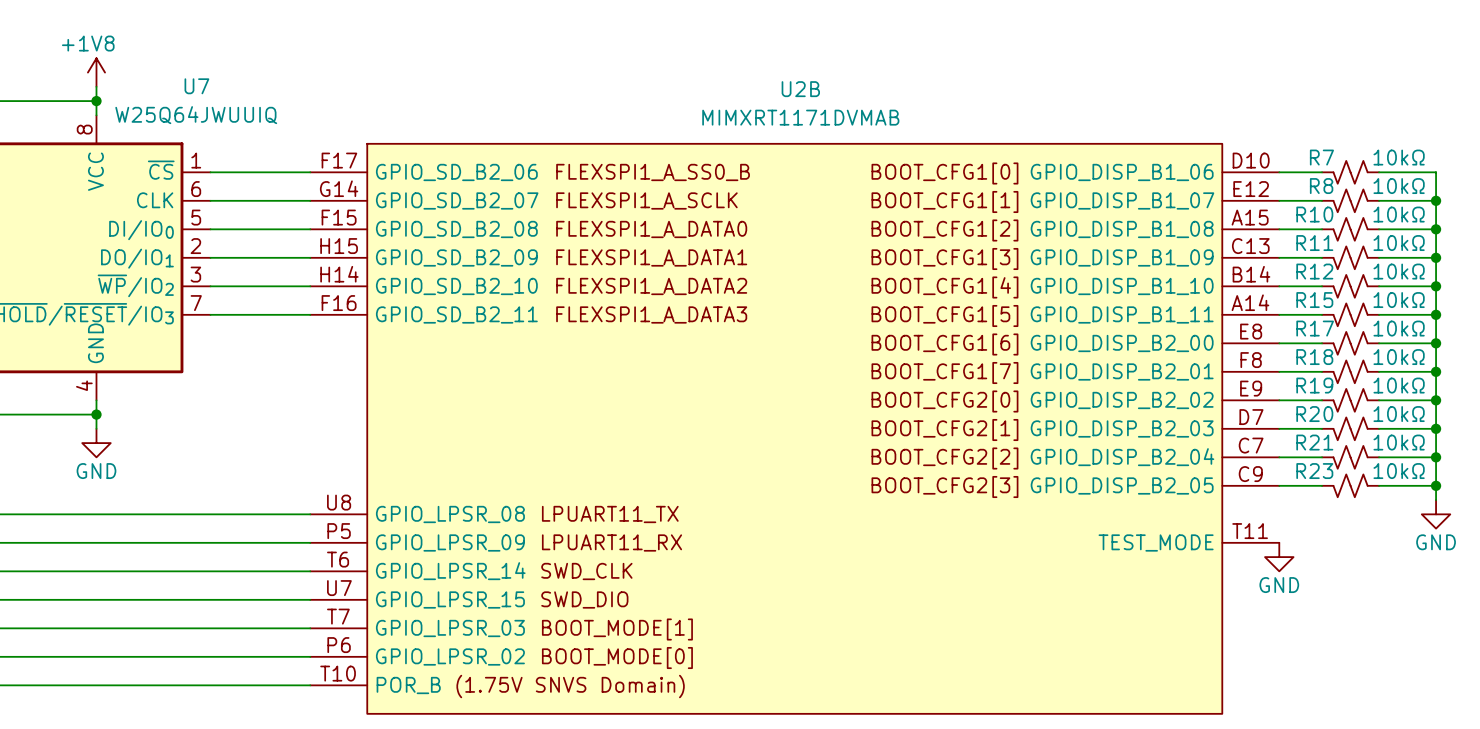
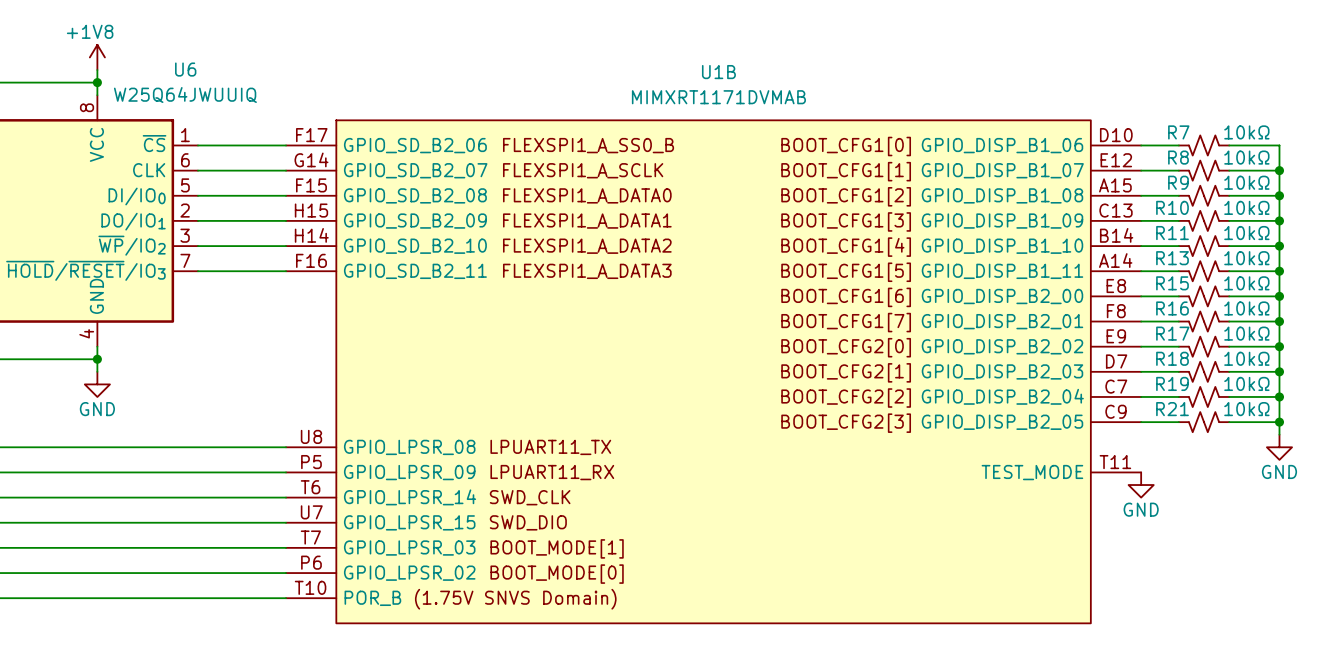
U7 name: U7 (196, 86) -> U6 (185, 69)
U2B name: U2B (800, 89) -> U1B (718, 72)
R10 name: R10 (1314, 214) -> R9 (1178, 182)
R11 name: R11 (1314, 243) -> R10 (1172, 207)
R12 name: R12 (1314, 271) -> R11 (1172, 233)
R15 name: R15 (1314, 300) -> R13 (1172, 258)
R17 name: R17 (1315, 328) -> R15 (1172, 283)
R18 name: R18 (1314, 357) -> R16 (1172, 308)
R19 name: R19 (1314, 385) -> R17 (1172, 333)
R20 name: R20 (1314, 414) -> R18 (1172, 358)
R21 name: R21 (1314, 442) -> R19 (1172, 383)
R23 name: R23 (1314, 471) -> R21 (1172, 409)

